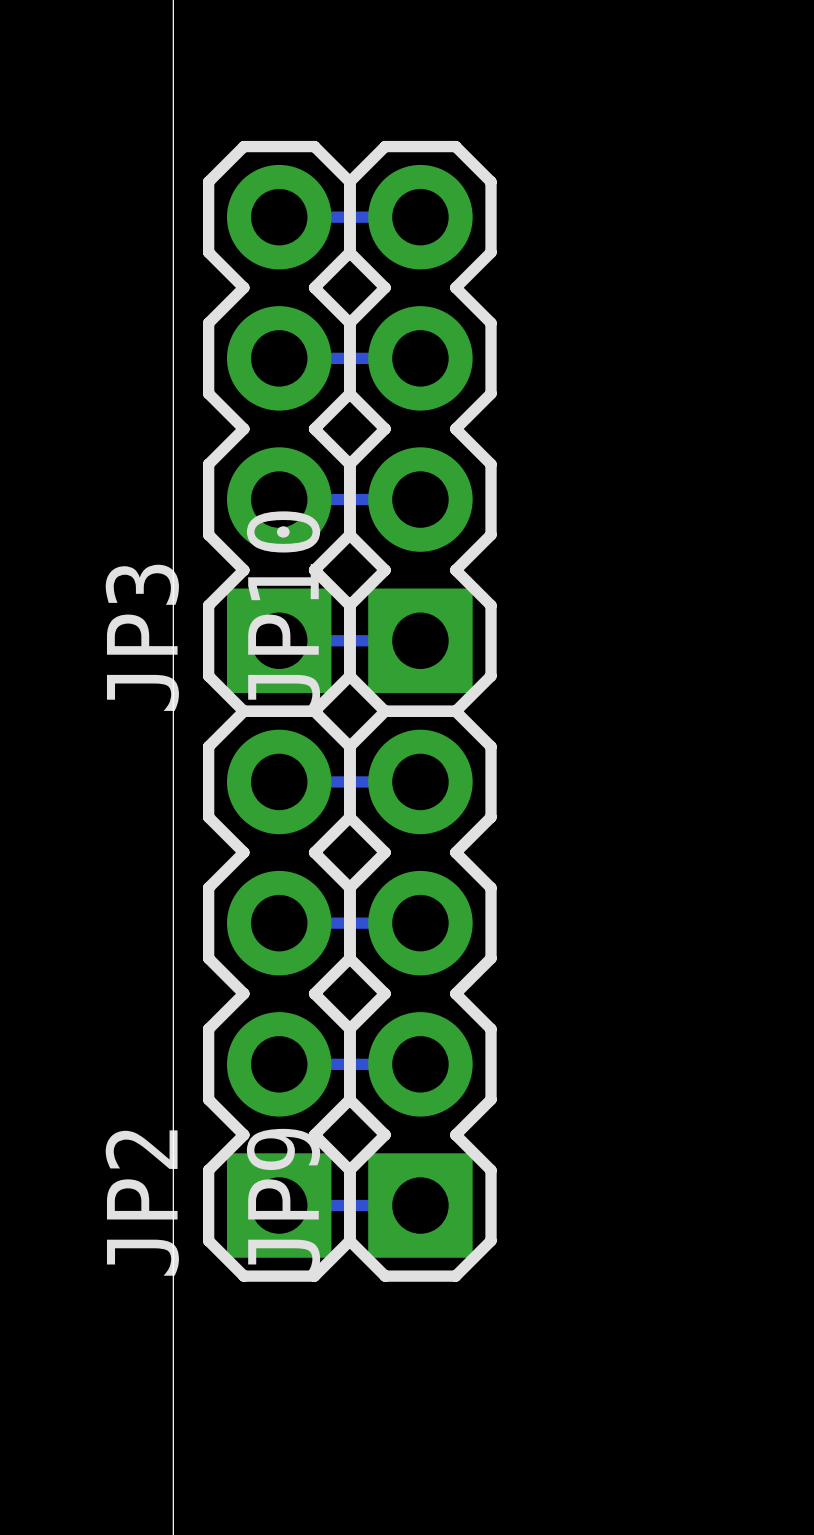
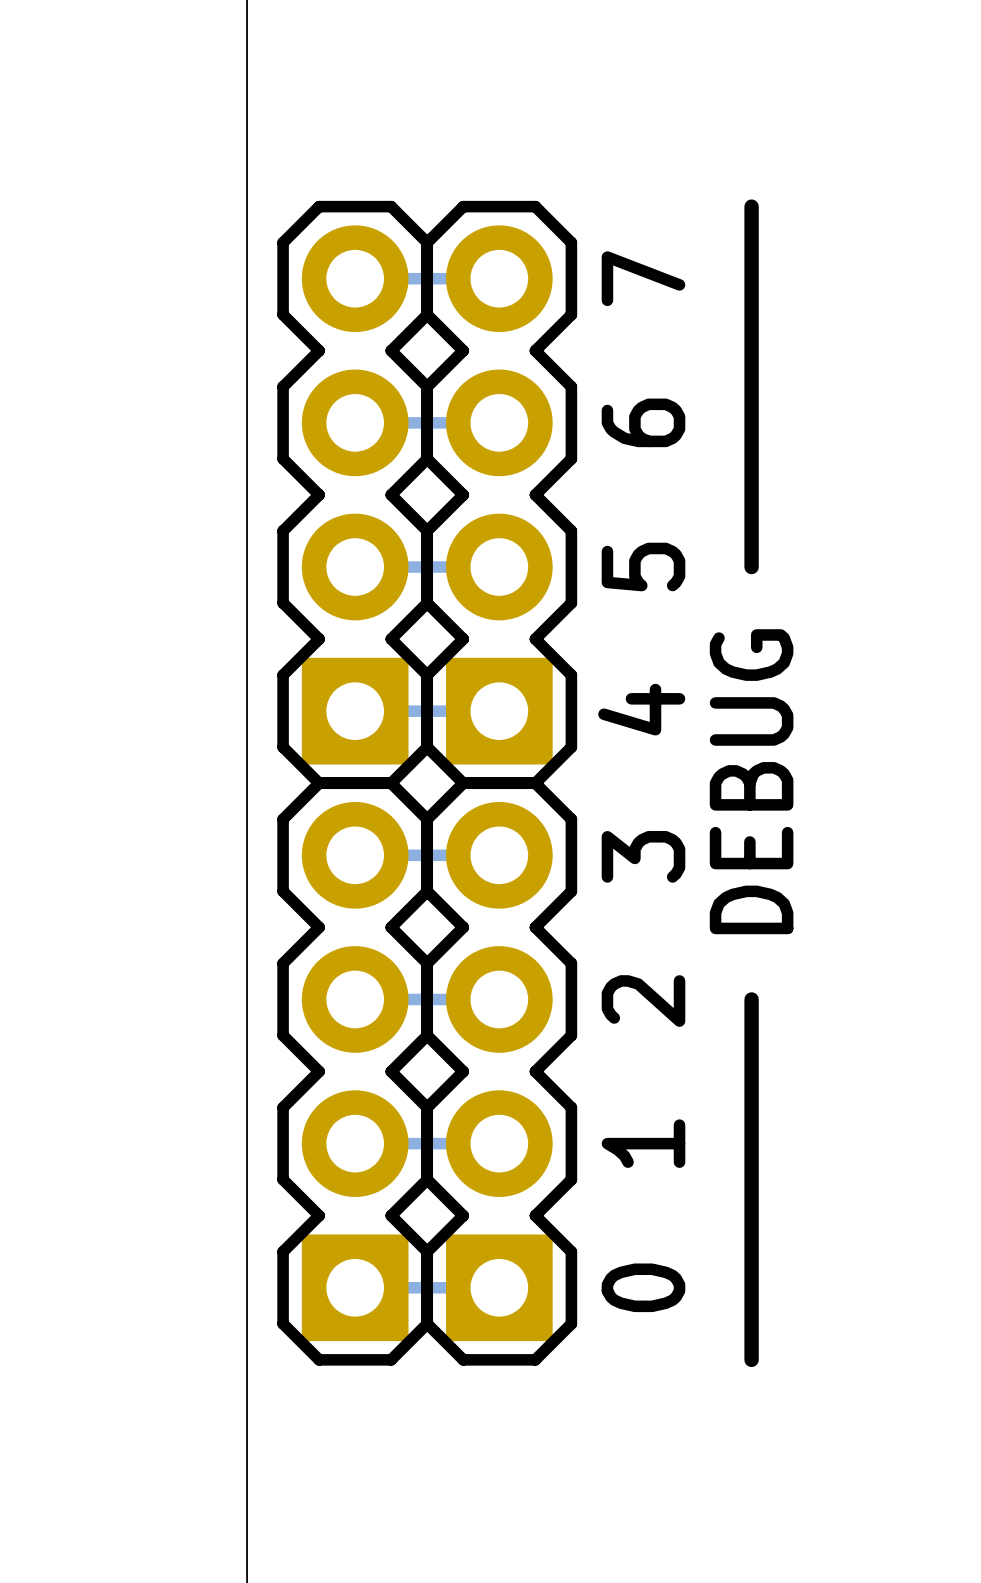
line: none -> (751, 206) (751, 567)
text: none -> 7 (643, 278)
text: none -> 6 (643, 422)
text: none -> 5 (643, 567)
JP10 name: JP10 (283, 611) -> none
JP3 name: JP3 (142, 637) -> none
text: none -> 4 (641, 709)
text: none -> DEBUG (751, 781)
text: none -> 3 (643, 856)
text: none -> 2 (643, 1001)
line: none -> (751, 999) (751, 1359)
text: none -> 1 (643, 1143)
JP9 name: JP9 (283, 1202) -> none
JP2 name: JP2 (142, 1203) -> none
text: none -> 0 (643, 1287)

